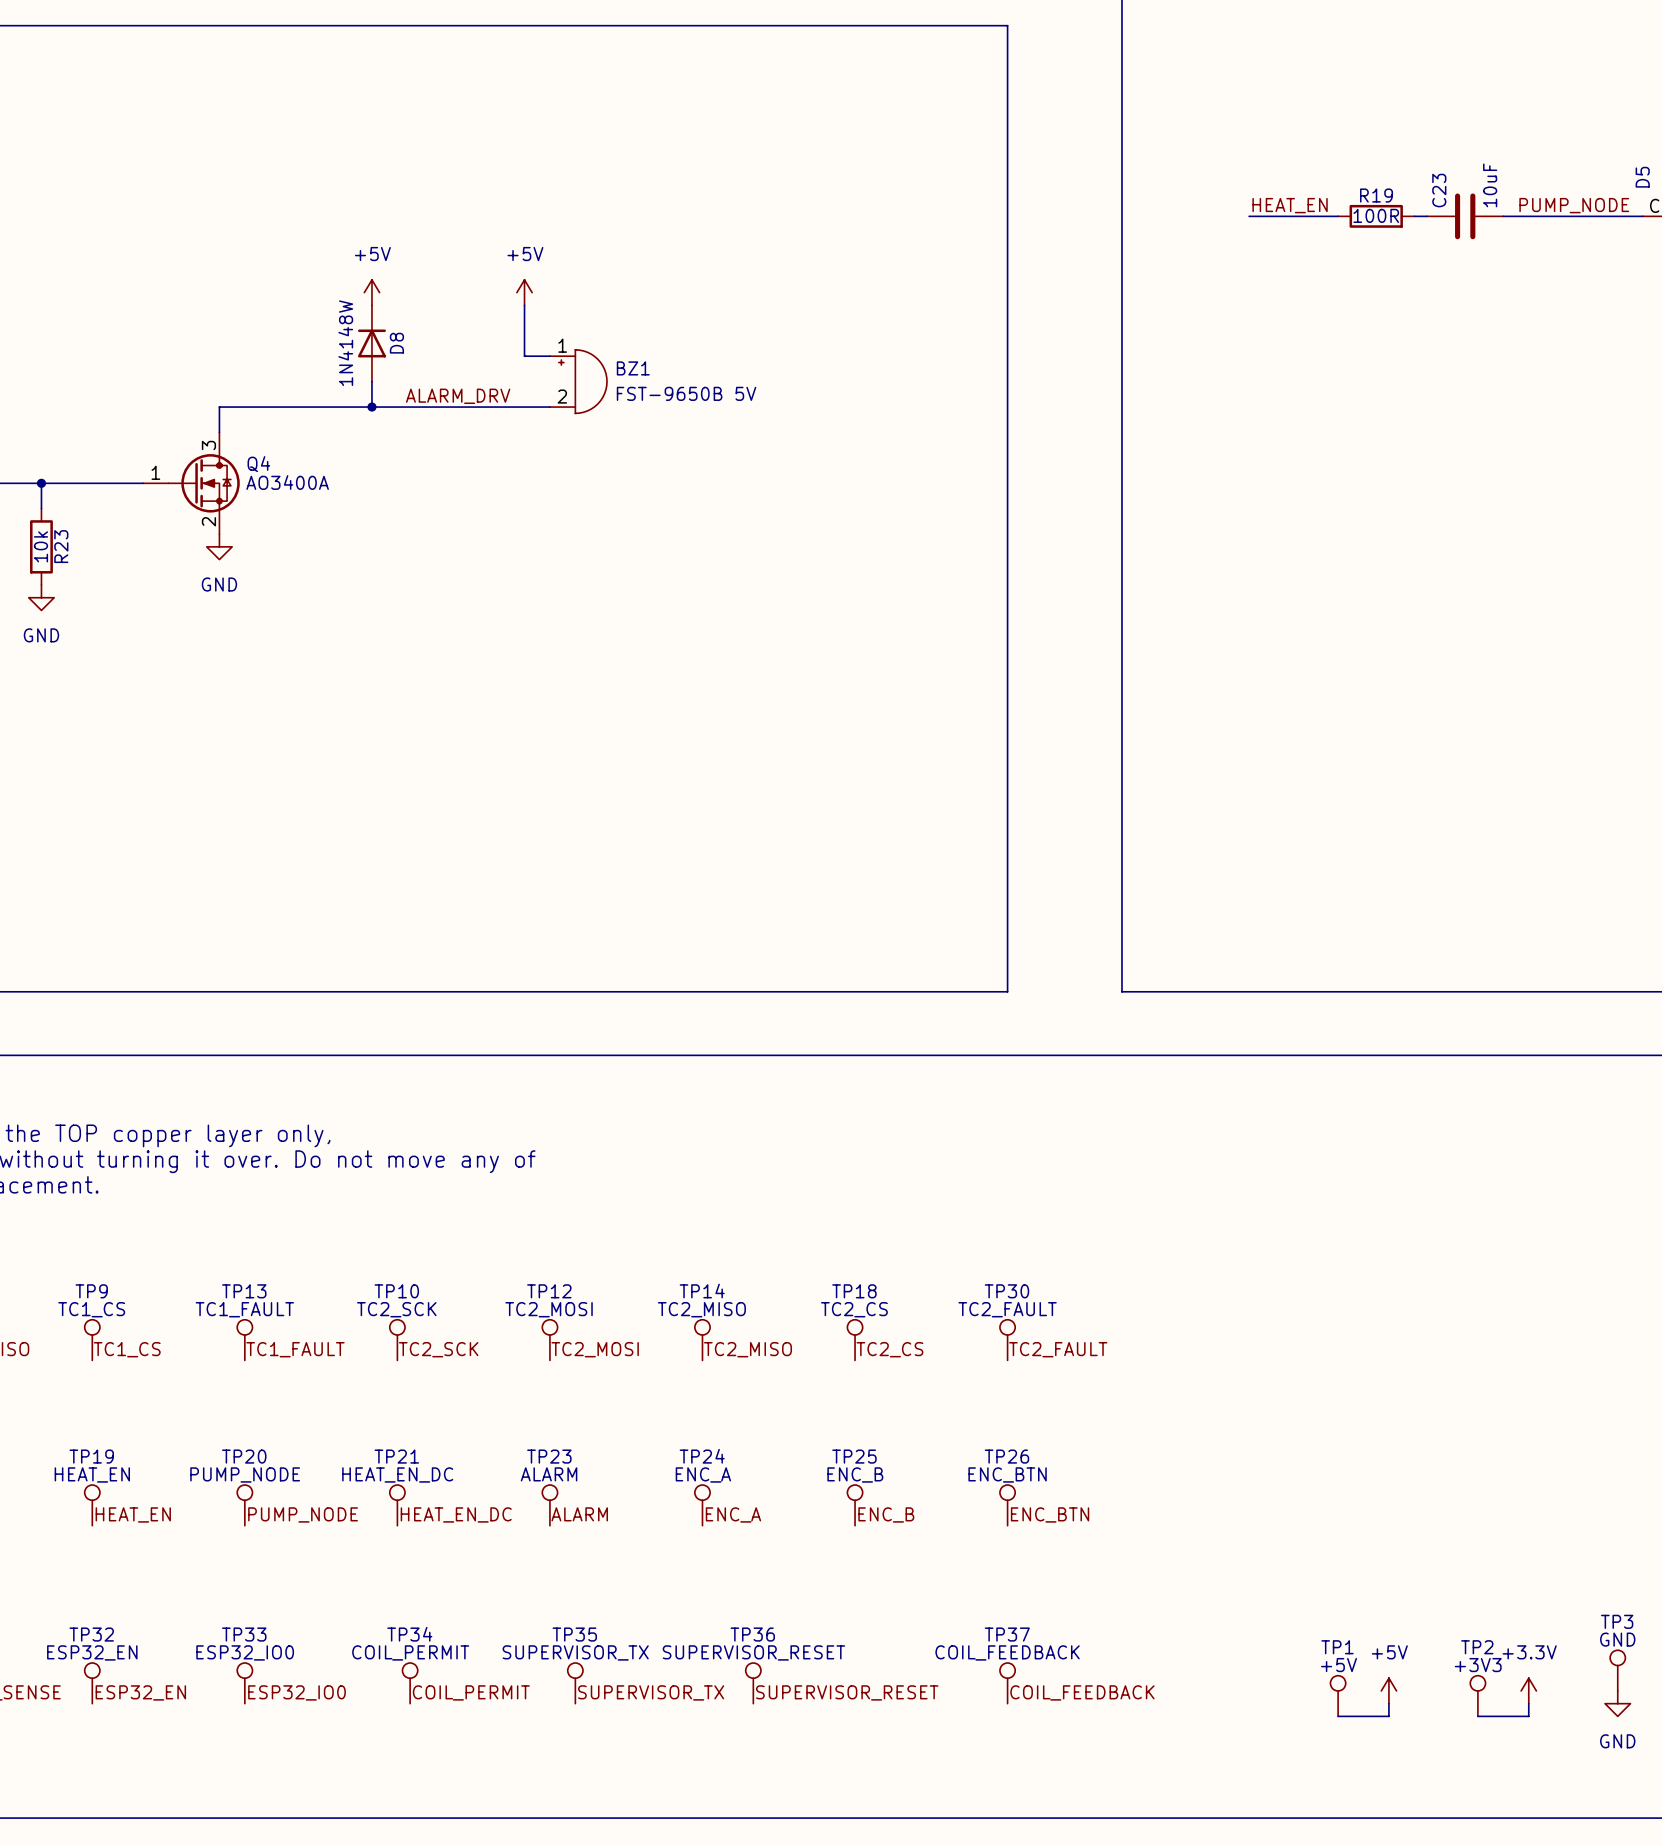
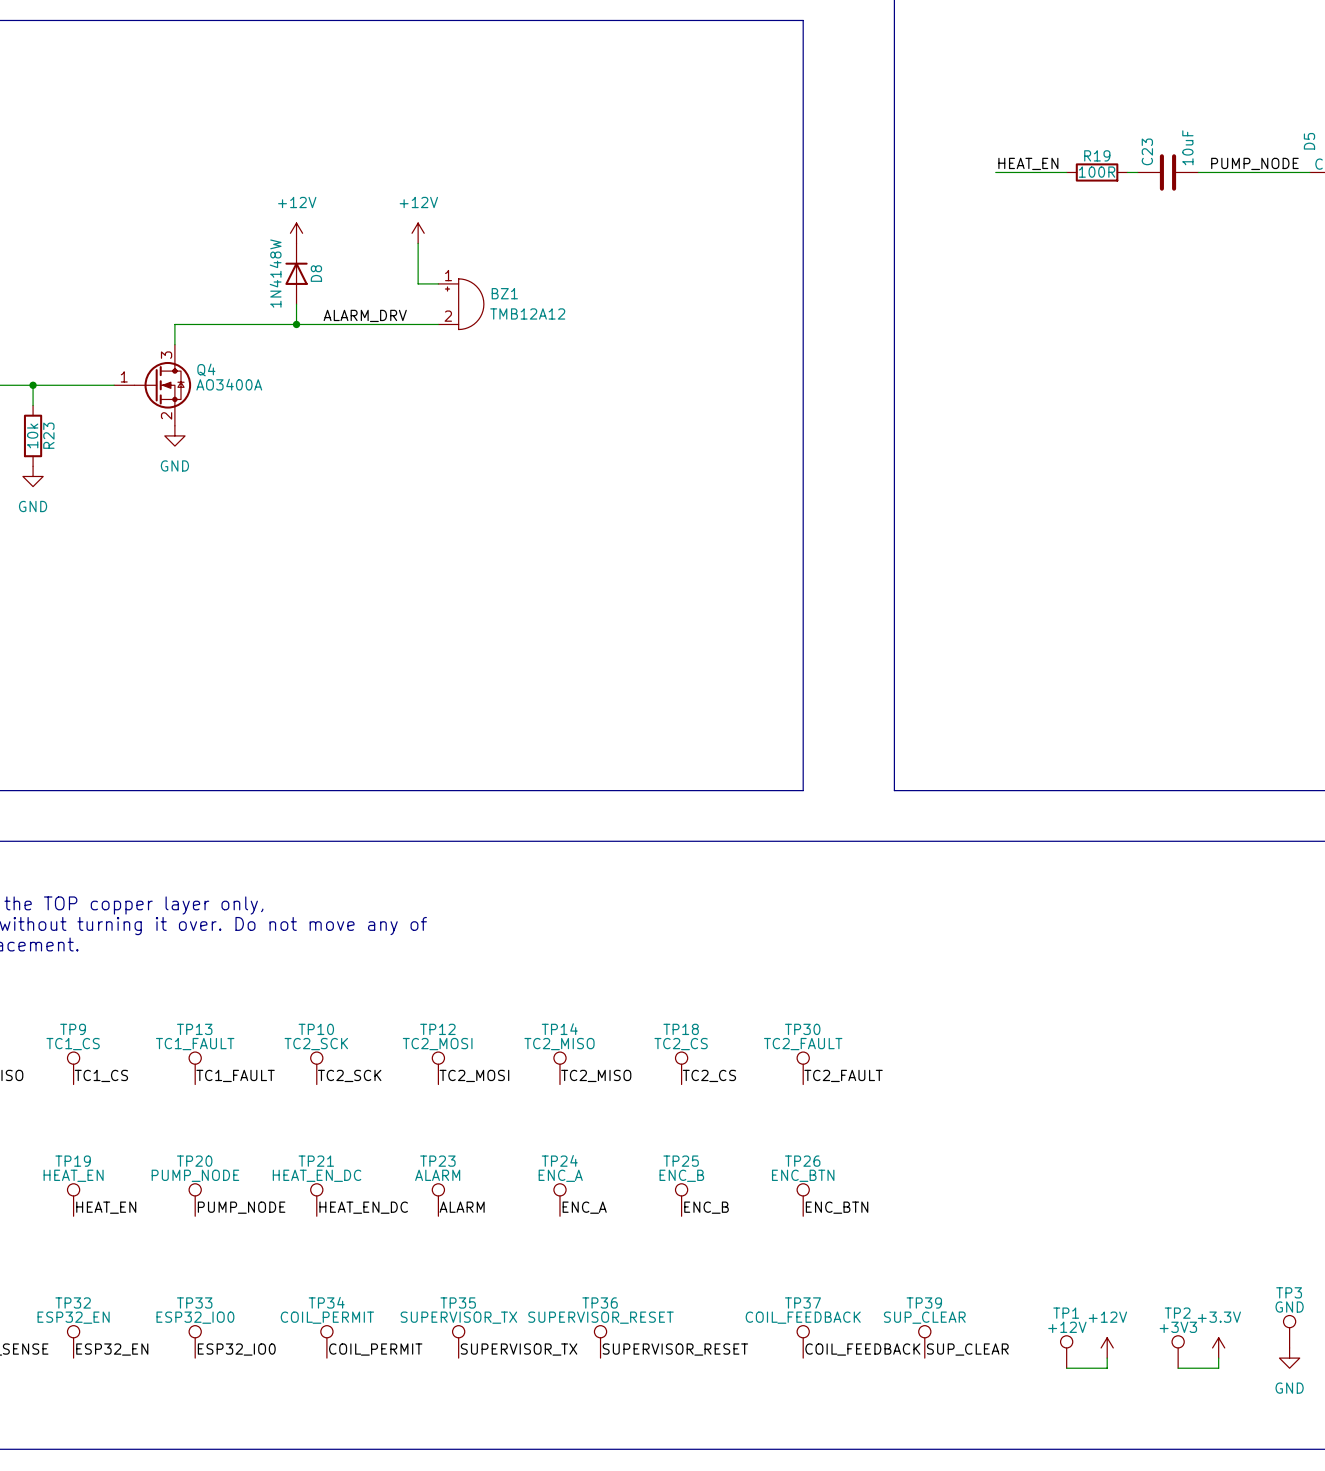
power symbol: +5V (371, 292) -> +12V (296, 233)
power symbol: +5V (524, 292) -> +12V (418, 233)
BZ1 value: FST-9650B 5V (686, 393) -> TMB12A12 (527, 313)
TP1 value: +5V (1338, 1665) -> +12V (1067, 1327)
TP39: none -> SUP_CLEAR (924, 1341)
power symbol: +5V (1388, 1690) -> +12V (1107, 1347)
label: none -> SUP_CLEAR (967, 1349)

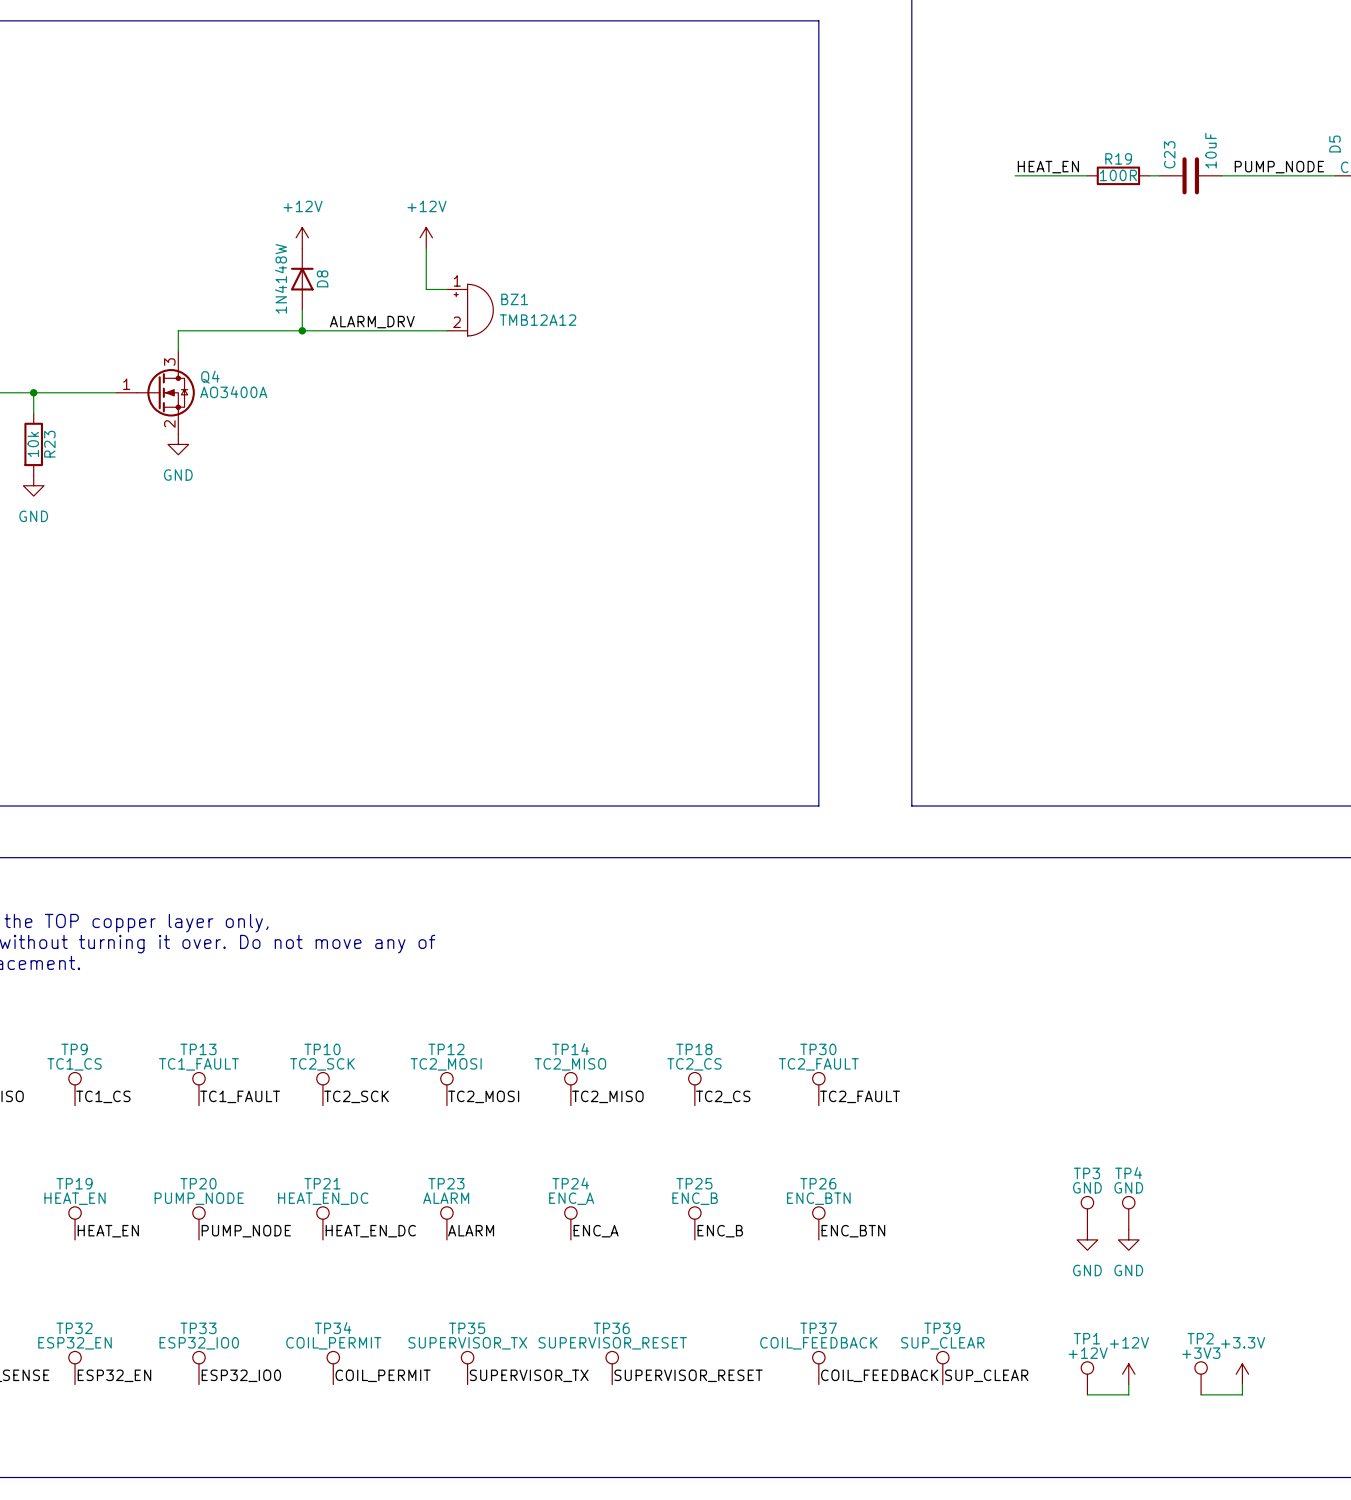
TP4: none -> GND (1128, 1213)
power symbol: none -> GND (1087, 1239)
power symbol: none -> GND (1128, 1239)
TP3 position: (1289, 1331) -> (1087, 1213)
power symbol: GND (1289, 1358) -> none

